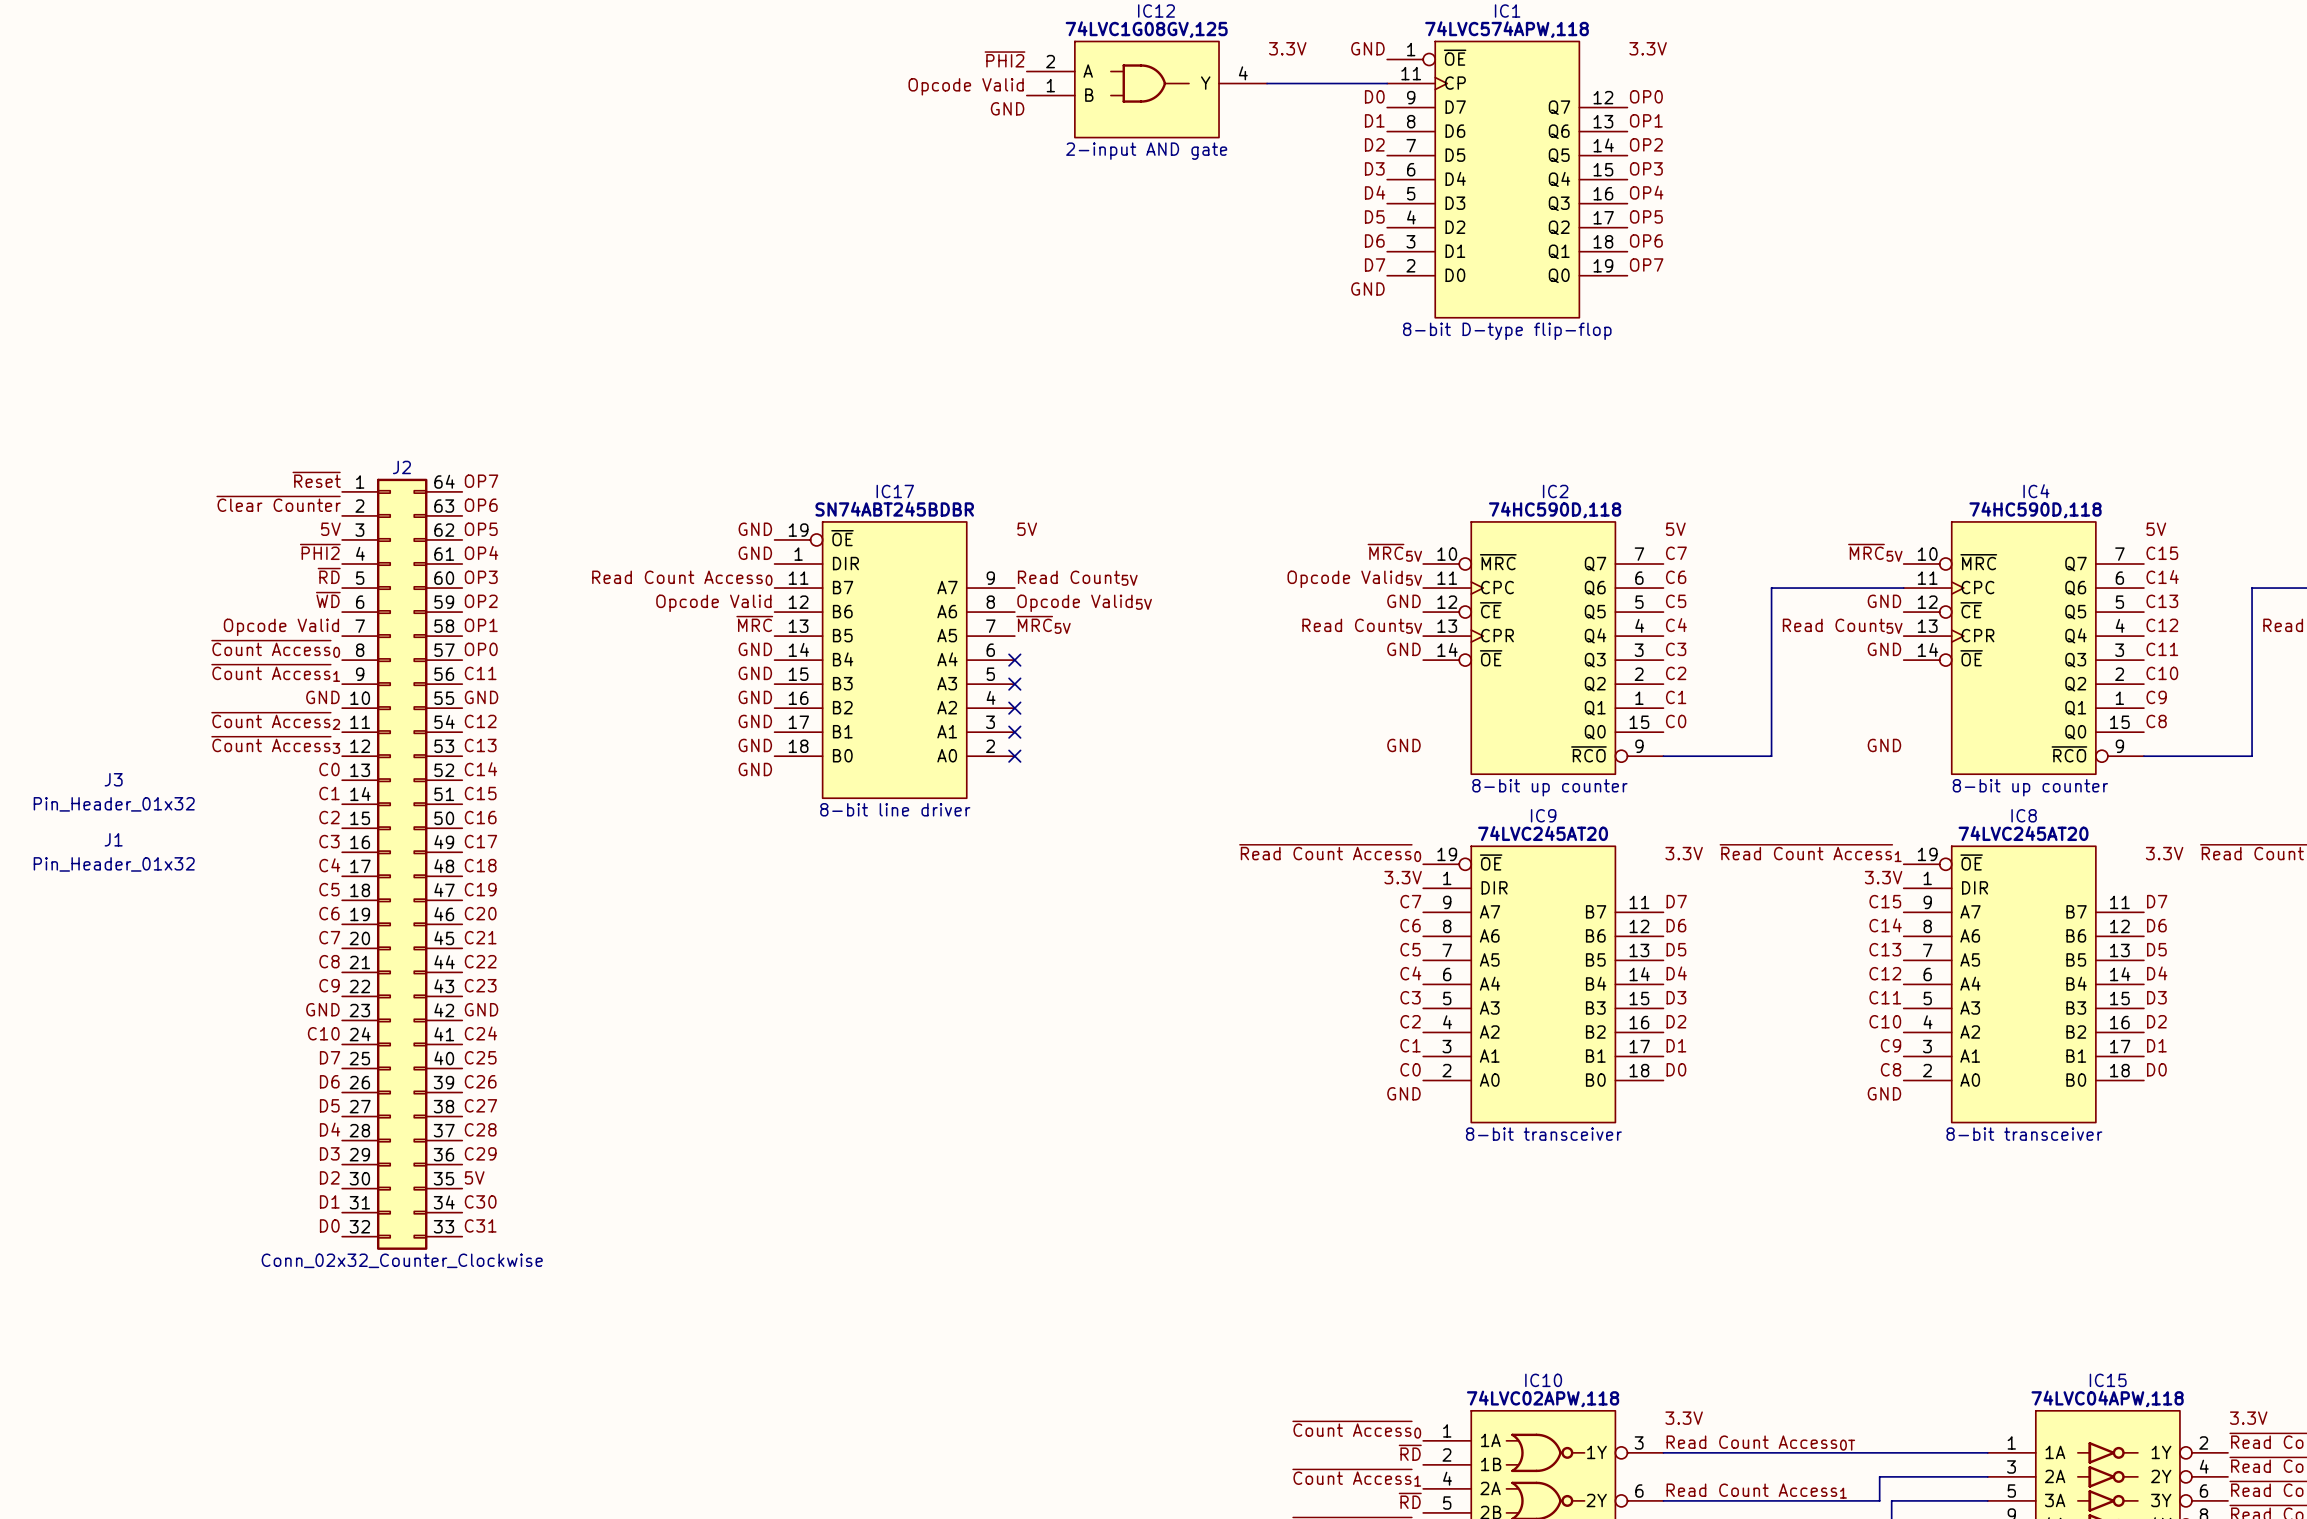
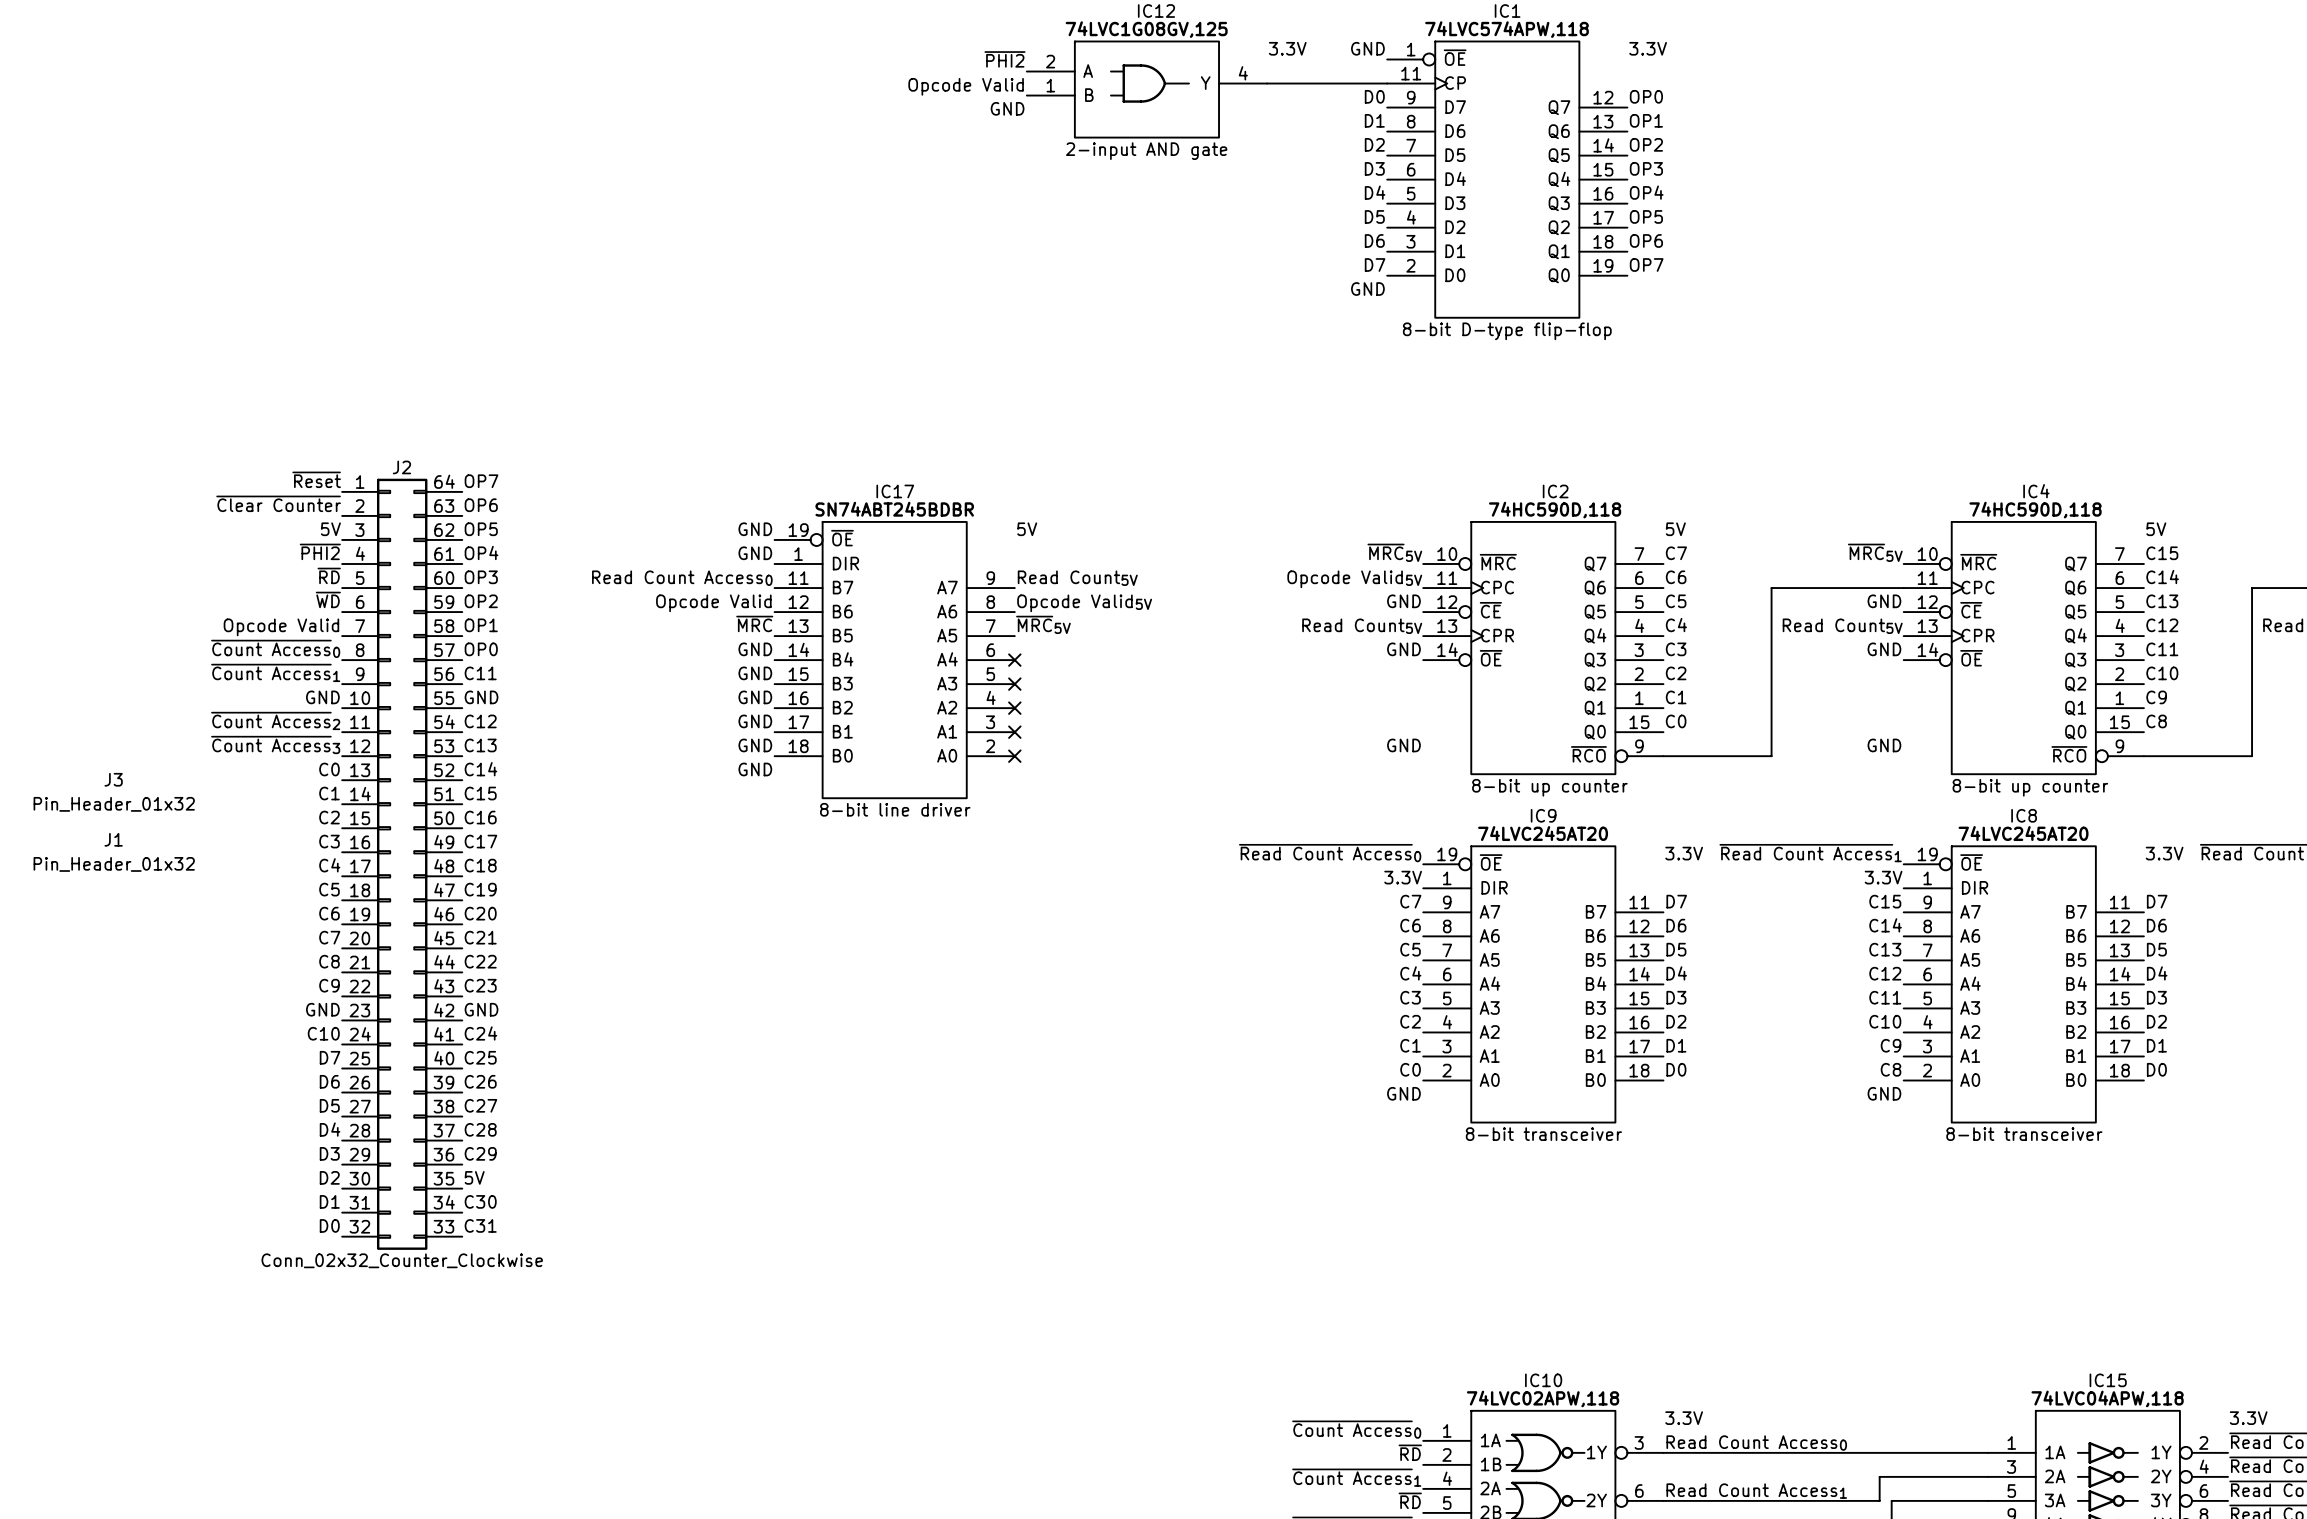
label: Read Count Access0T (1760, 1443) -> Read Count Access0 (1756, 1443)

